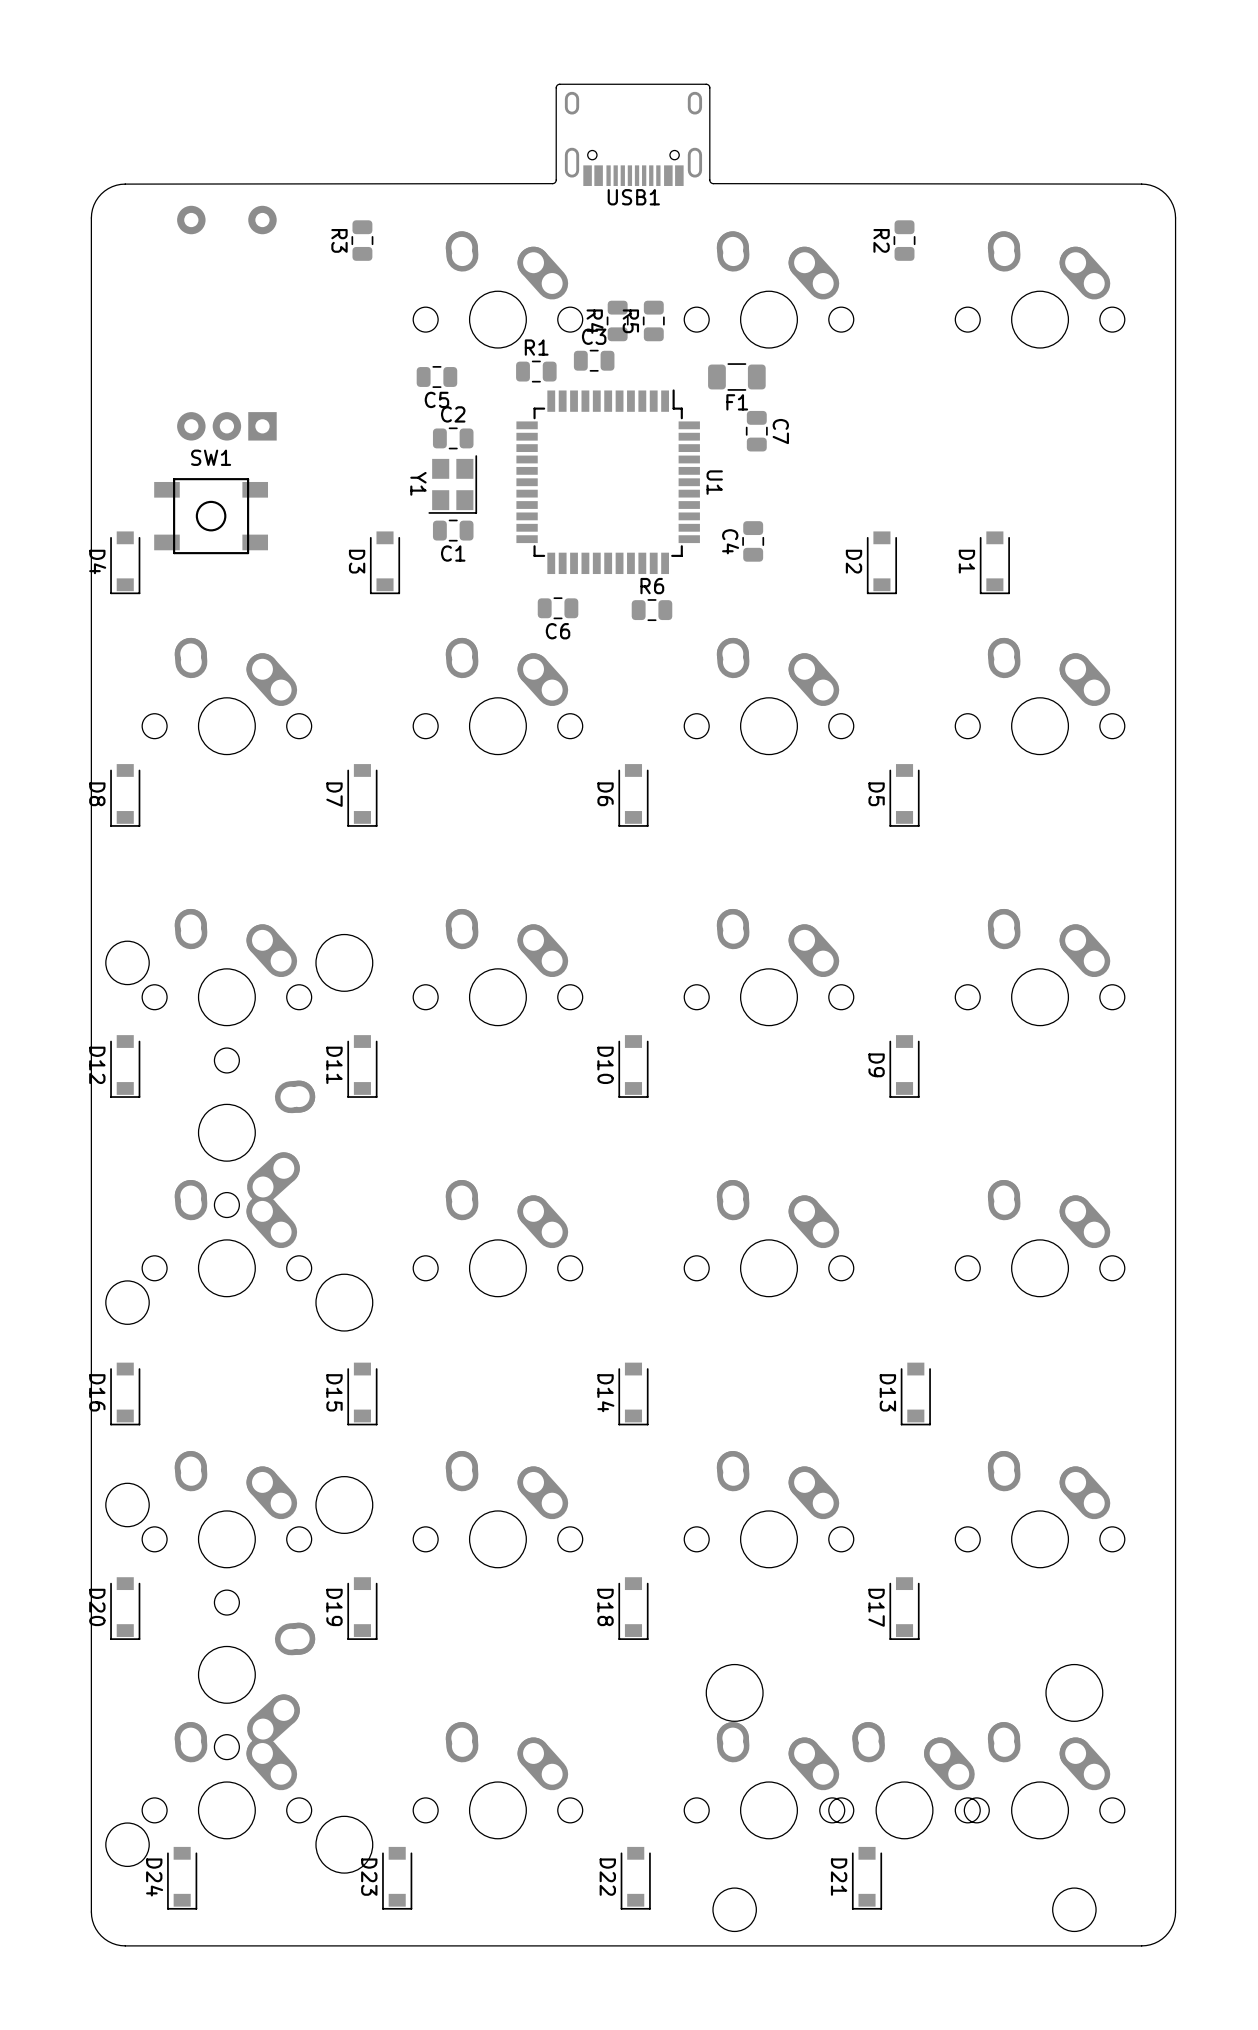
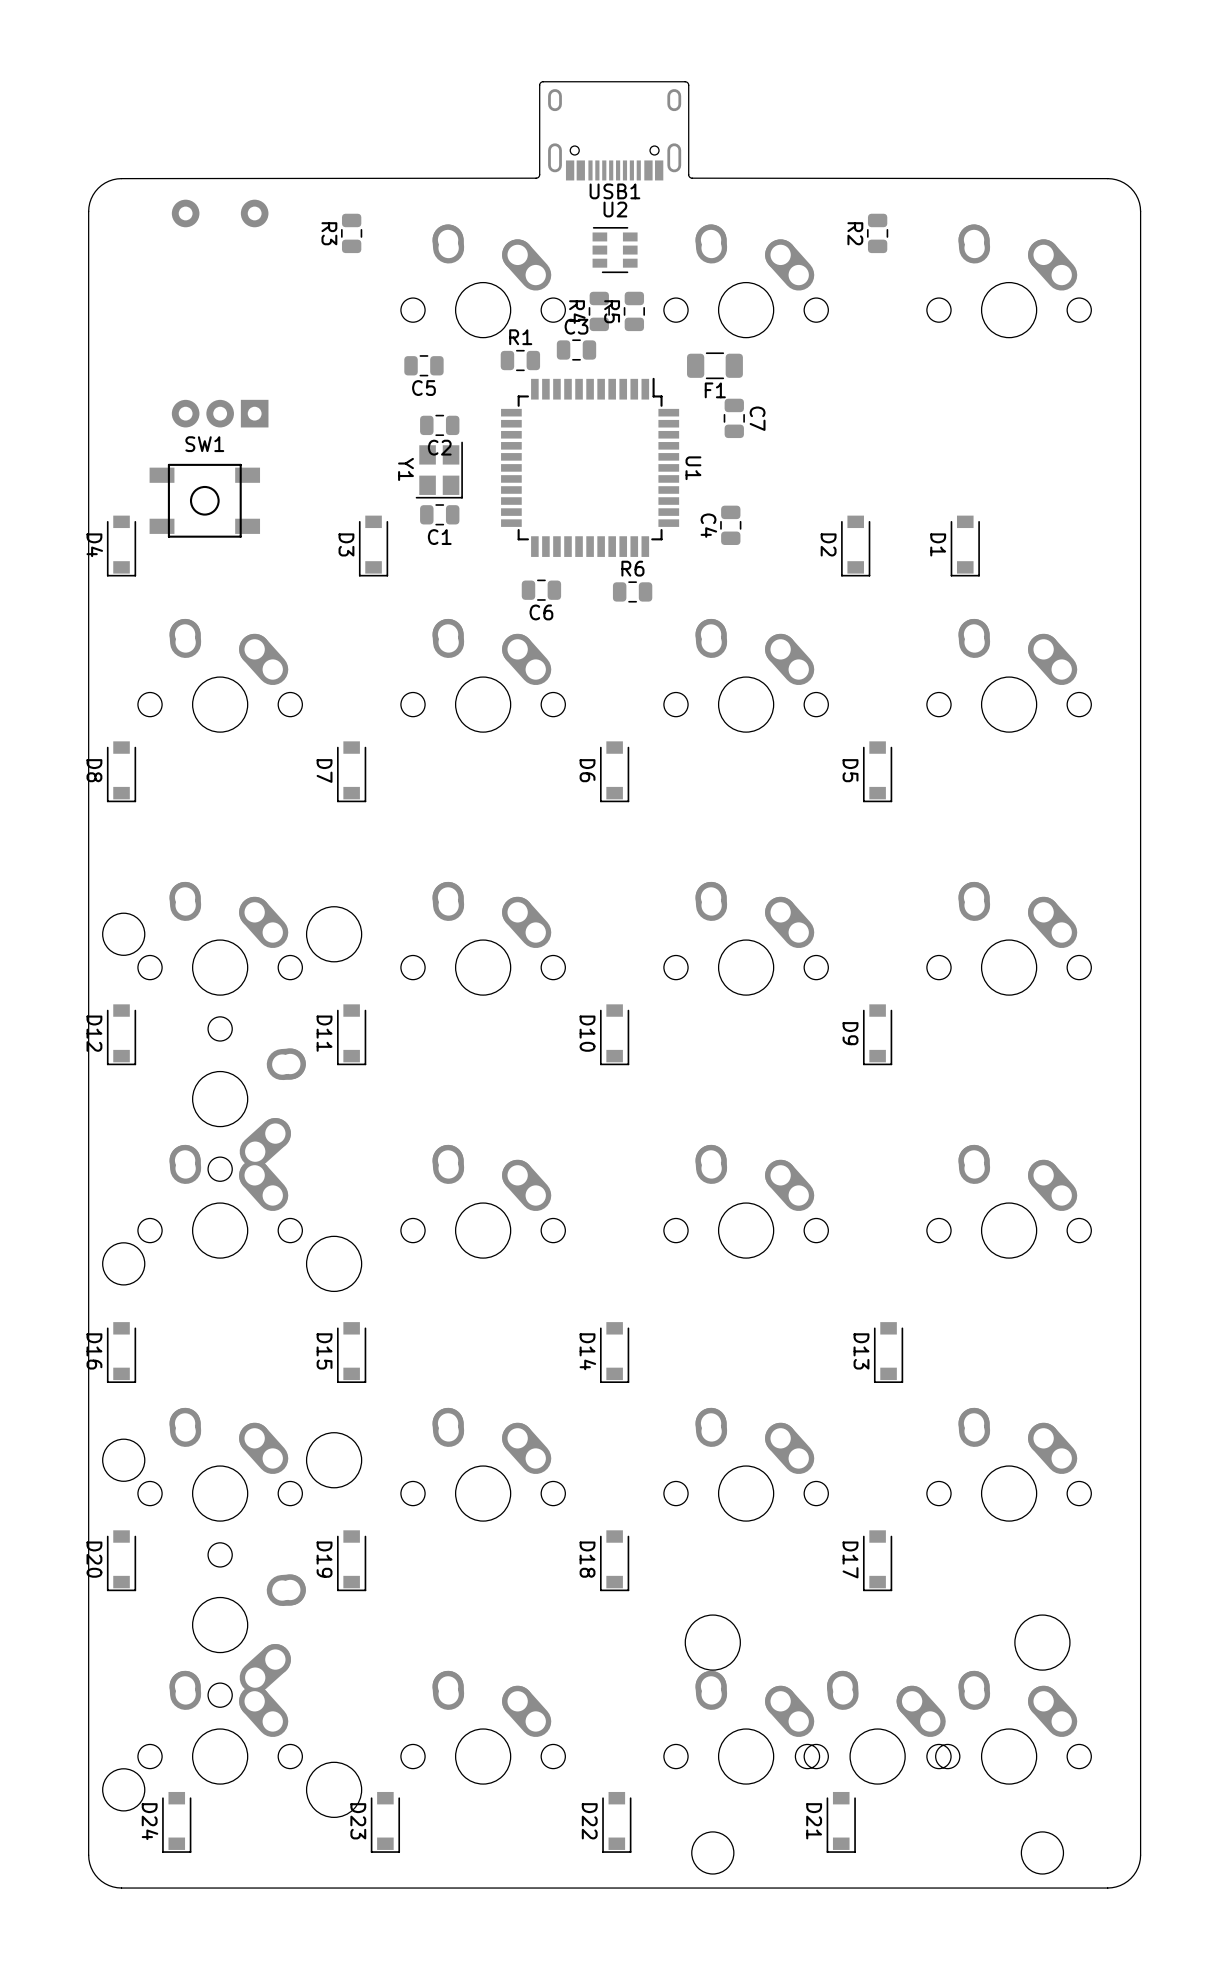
U2: none -> (615, 250)
C2 name position: C2 (453, 414) -> C2 (439, 447)

